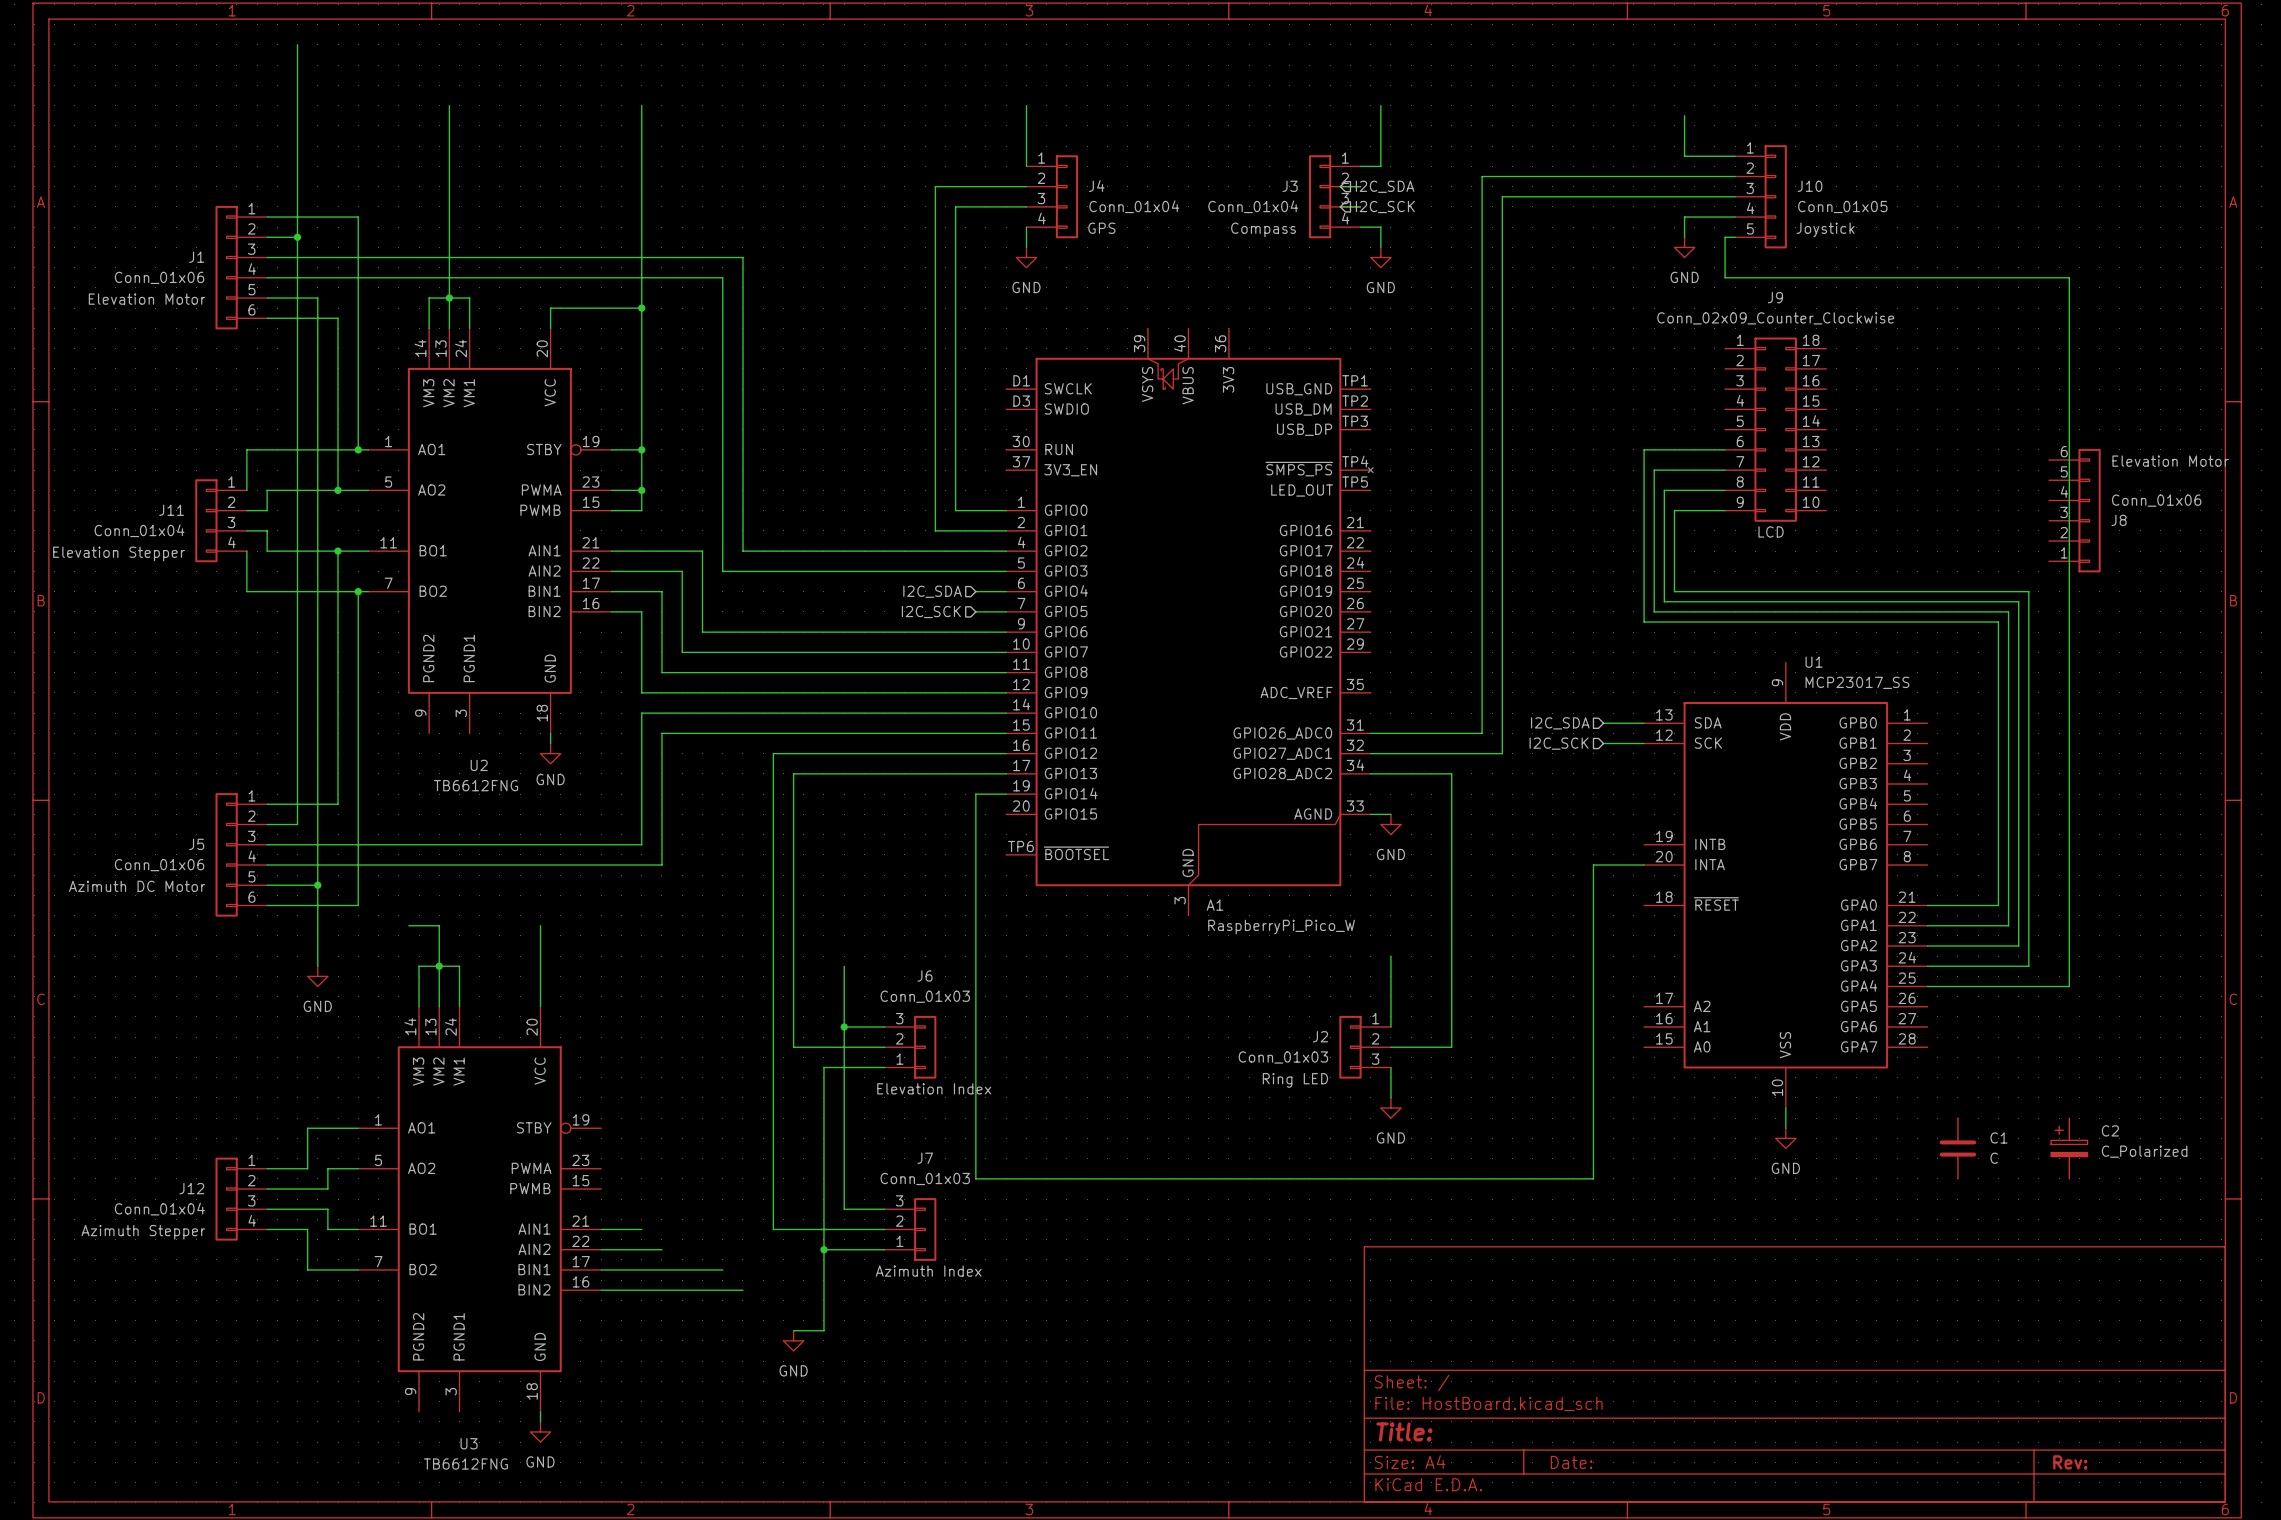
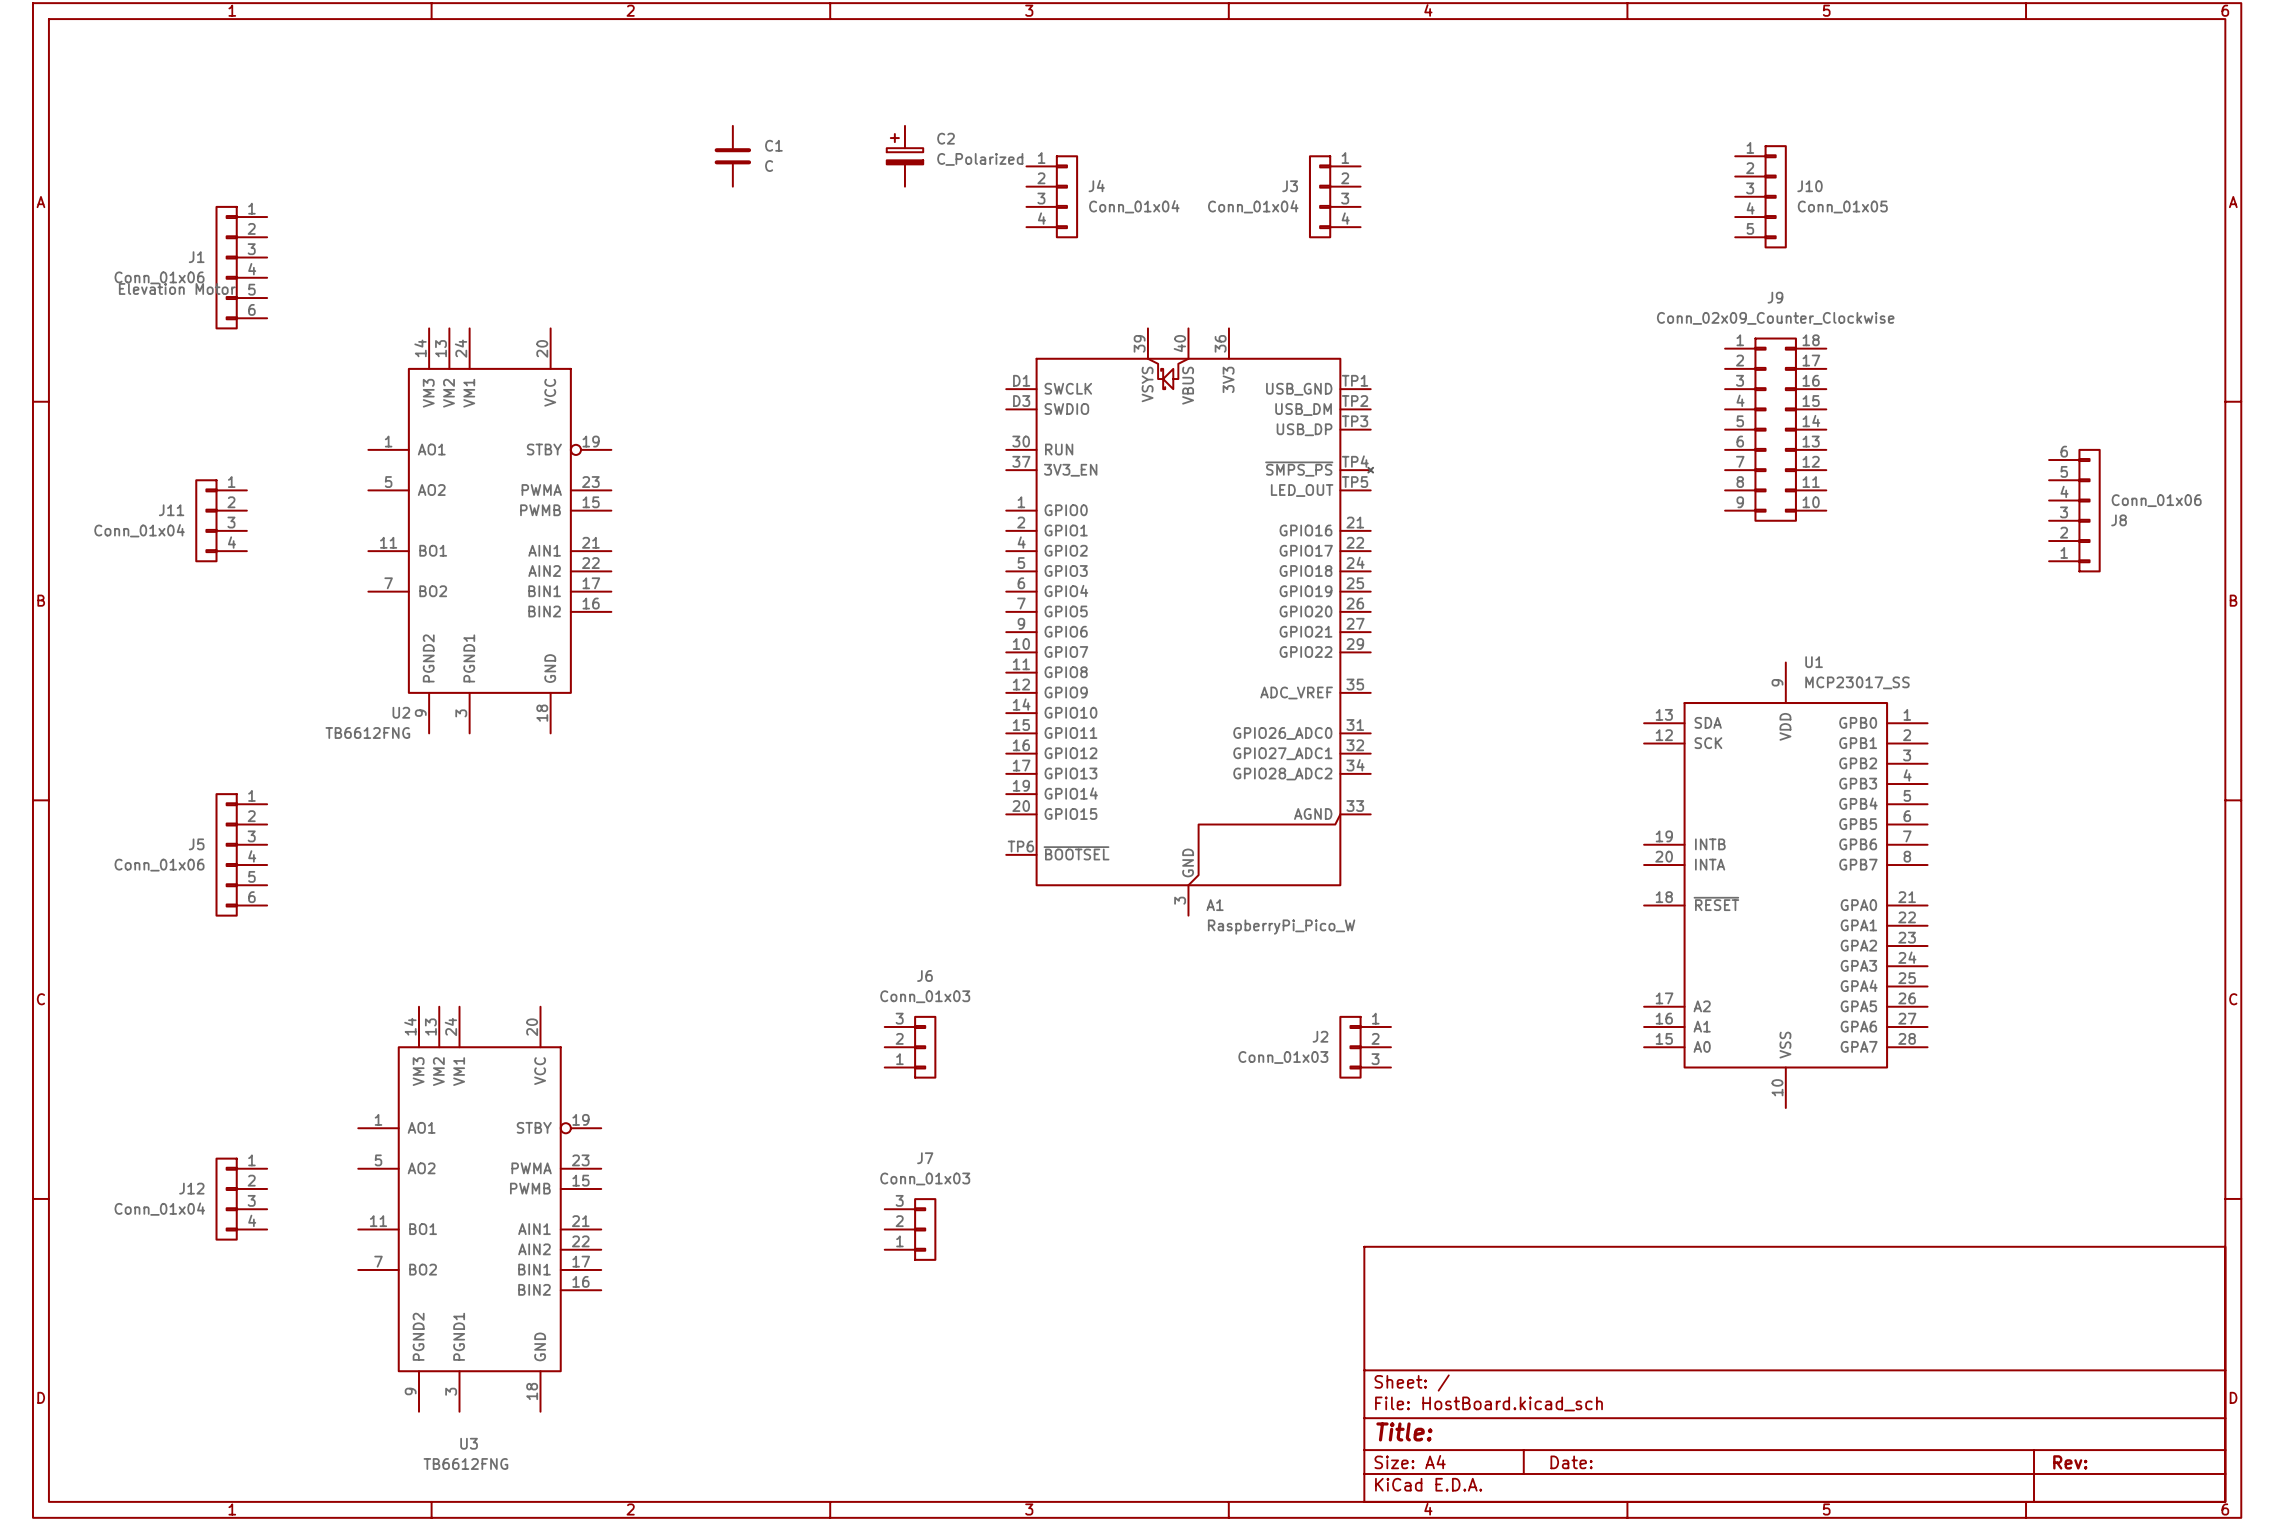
wire: (297, 44) (297, 824) (267, 824) -> none
wire: (449, 105) (449, 328) -> none
wire: (641, 105) (641, 510) (611, 510) -> none
wire: (1026, 105) (1026, 166) -> none
wire: (1380, 105) (1380, 166) (1360, 166) -> none
wire: (1684, 115) (1684, 156) (1735, 156) -> none
wire: (1735, 176) (1482, 176) (1482, 733) (1370, 733) -> none
wire: (1026, 186) (935, 186) (935, 530) (1006, 530) -> none
hierarchical label: I2C_SDA (1385, 186) -> none
wire: (1735, 196) (1502, 196) (1502, 753) (1370, 753) -> none
wire: (1026, 206) (955, 206) (955, 510) (1006, 510) -> none
hierarchical label: I2C_SCK (1385, 207) -> none
wire: (267, 217) (358, 217) (358, 449) -> none
wire: (1735, 217) (1684, 217) (1684, 237) -> none
wire: (1026, 227) (1026, 247) -> none
wire: (1360, 227) (1380, 227) (1380, 247) -> none
label: GPS (1101, 228) -> none
label: Compass (1263, 229) -> none
label: Joystick (1825, 229) -> none
wire: (267, 237) (297, 237) -> none
junction: (297, 237) -> none
wire: (1735, 237) (1725, 237) (1725, 277) (2069, 277) (2069, 986) (1927, 986) -> none
power symbol: GND (1684, 247) -> none
wire: (267, 257) (742, 257) (742, 551) (1006, 551) -> none
power symbol: GND (1026, 257) -> none
power symbol: GND (1380, 257) -> none
wire: (267, 277) (722, 277) (722, 571) (1006, 571) -> none
wire: (267, 298) (317, 298) (317, 966) -> none
junction: (449, 298) -> none
label position: Elevation Motor (147, 299) -> Elevation Motor (177, 288)
wire: (641, 308) (550, 308) (550, 328) -> none
junction: (641, 308) -> none
wire: (267, 318) (338, 318) (338, 490) -> none
wire: (429, 328) (429, 298) (469, 298) (469, 328) -> none
junction: (358, 449) -> none
wire: (368, 449) (246, 449) (246, 490) -> none
wire: (611, 449) (641, 449) -> none
junction: (641, 449) -> none
wire: (1725, 449) (1644, 449) (1644, 622) (1998, 622) (1998, 905) (1927, 905) -> none
label: Elevation Motor (2170, 461) -> none
wire: (1725, 470) (1654, 470) (1654, 611) (2008, 611) (2008, 925) (1927, 925) -> none
junction: (338, 490) -> none
wire: (368, 490) (267, 490) (267, 510) (246, 510) -> none
wire: (611, 490) (641, 490) -> none
junction: (641, 490) -> none
wire: (1725, 490) (1664, 490) (1664, 601) (2018, 601) (2018, 946) (1927, 946) -> none
wire: (1725, 510) (1674, 510) (1674, 591) (2028, 591) (2028, 966) (1927, 966) -> none
wire: (246, 530) (267, 530) (267, 551) (368, 551) -> none
label: LCD (1771, 531) -> none
wire: (246, 551) (246, 591) (368, 591) -> none
wire: (338, 551) (338, 804) (267, 804) -> none
junction: (338, 551) -> none
wire: (611, 551) (702, 551) (702, 632) (1006, 632) -> none
label: Elevation Stepper (119, 553) -> none
wire: (611, 571) (682, 571) (682, 652) (1006, 652) -> none
wire: (358, 591) (358, 905) (267, 905) -> none
junction: (358, 591) -> none
wire: (611, 591) (661, 591) (661, 672) (1006, 672) -> none
hierarchical label: I2C_SDA (932, 591) -> none
wire: (975, 591) (1006, 591) -> none
wire: (611, 611) (641, 611) (641, 692) (1006, 692) -> none
hierarchical label: I2C_SCK (931, 611) -> none
wire: (975, 611) (1006, 611) -> none
wire: (1006, 713) (641, 713) (641, 844) (267, 844) -> none
hierarchical label: I2C_SDA (1560, 723) -> none
wire: (1603, 723) (1644, 723) -> none
wire: (550, 733) (550, 743) -> none
wire: (1006, 733) (661, 733) (661, 865) (267, 865) -> none
hierarchical label: I2C_SCK (1559, 743) -> none
wire: (1603, 743) (1644, 743) -> none
power symbol: GND (550, 753) -> none
wire: (1006, 753) (773, 753) (773, 1229) (884, 1229) -> none
U2 name position: U2 (479, 765) -> U2 (401, 712)
wire: (1006, 773) (793, 773) (793, 1047) (884, 1047) -> none
wire: (1370, 773) (1451, 773) (1451, 1047) (1390, 1047) -> none
U2 value position: TB6612FNG (476, 785) -> TB6612FNG (367, 733)
wire: (1006, 794) (975, 794) (975, 1178) (1593, 1178) (1593, 865) (1644, 865) -> none
wire: (1370, 814) (1390, 814) -> none
power symbol: GND (1390, 824) -> none
wire: (267, 885) (317, 885) -> none
junction: (317, 885) -> none
label: Azimuth DC Motor (137, 886) -> none
wire: (408, 925) (439, 925) (439, 1006) -> none
wire: (540, 925) (540, 1006) -> none
wire: (1390, 956) (1390, 1027) -> none
junction: (439, 966) -> none
wire: (844, 966) (844, 1209) (884, 1209) -> none
power symbol: GND (317, 976) -> none
wire: (419, 1006) (419, 966) (459, 966) (459, 1006) -> none
wire: (844, 1027) (884, 1027) -> none
junction: (844, 1027) -> none
wire: (884, 1067) (823, 1067) (823, 1330) (793, 1330) -> none
wire: (1390, 1067) (1390, 1097) -> none
label: Ring LED (1295, 1080) -> none
label: Elevation Index (934, 1088) -> none
power symbol: GND (1390, 1107) -> none
wire: (1785, 1107) (1785, 1128) -> none
wire: (358, 1128) (307, 1128) (307, 1168) (267, 1168) -> none
power symbol: GND (1785, 1138) -> none
C1 position: (1957, 1148) -> (732, 156)
C2 position: (2069, 1148) -> (904, 156)
wire: (358, 1168) (327, 1168) (327, 1188) (267, 1188) -> none
wire: (267, 1209) (327, 1209) (327, 1229) (358, 1229) -> none
wire: (267, 1229) (307, 1229) (307, 1269) (358, 1269) -> none
wire: (601, 1229) (641, 1229) -> none
label: Azimuth Stepper (143, 1232) -> none
wire: (601, 1249) (661, 1249) -> none
wire: (823, 1249) (884, 1249) -> none
junction: (823, 1249) -> none
wire: (601, 1269) (722, 1269) -> none
label: Azimuth Index (928, 1271) -> none
wire: (601, 1290) (742, 1290) -> none
power symbol: GND (793, 1340) -> none
wire: (540, 1411) (540, 1421) -> none
power symbol: GND (540, 1431) -> none

